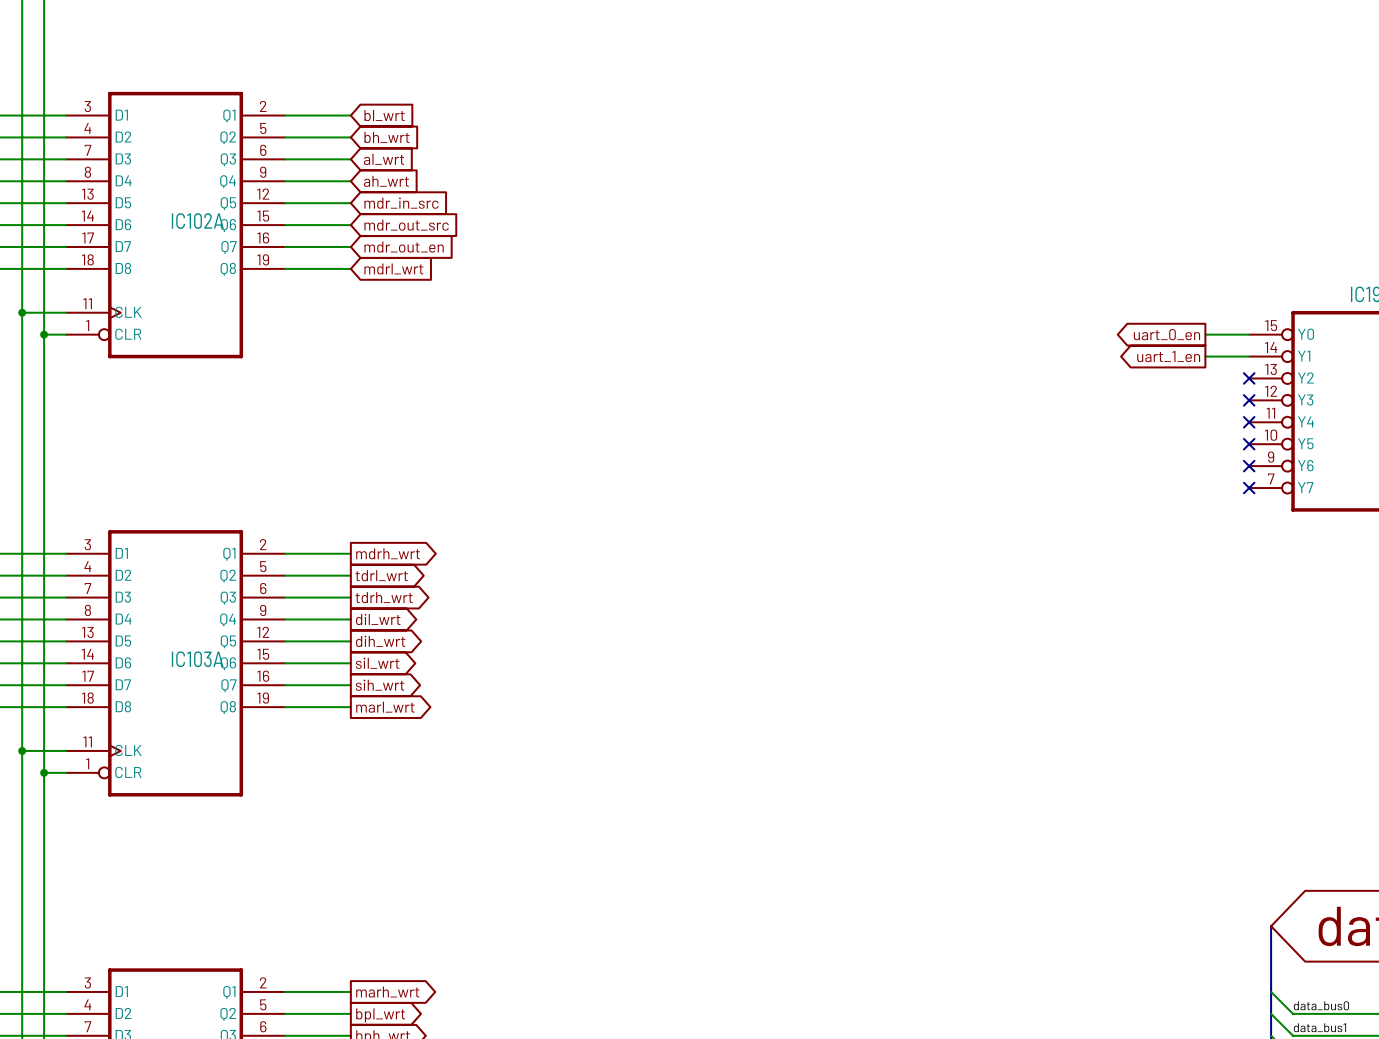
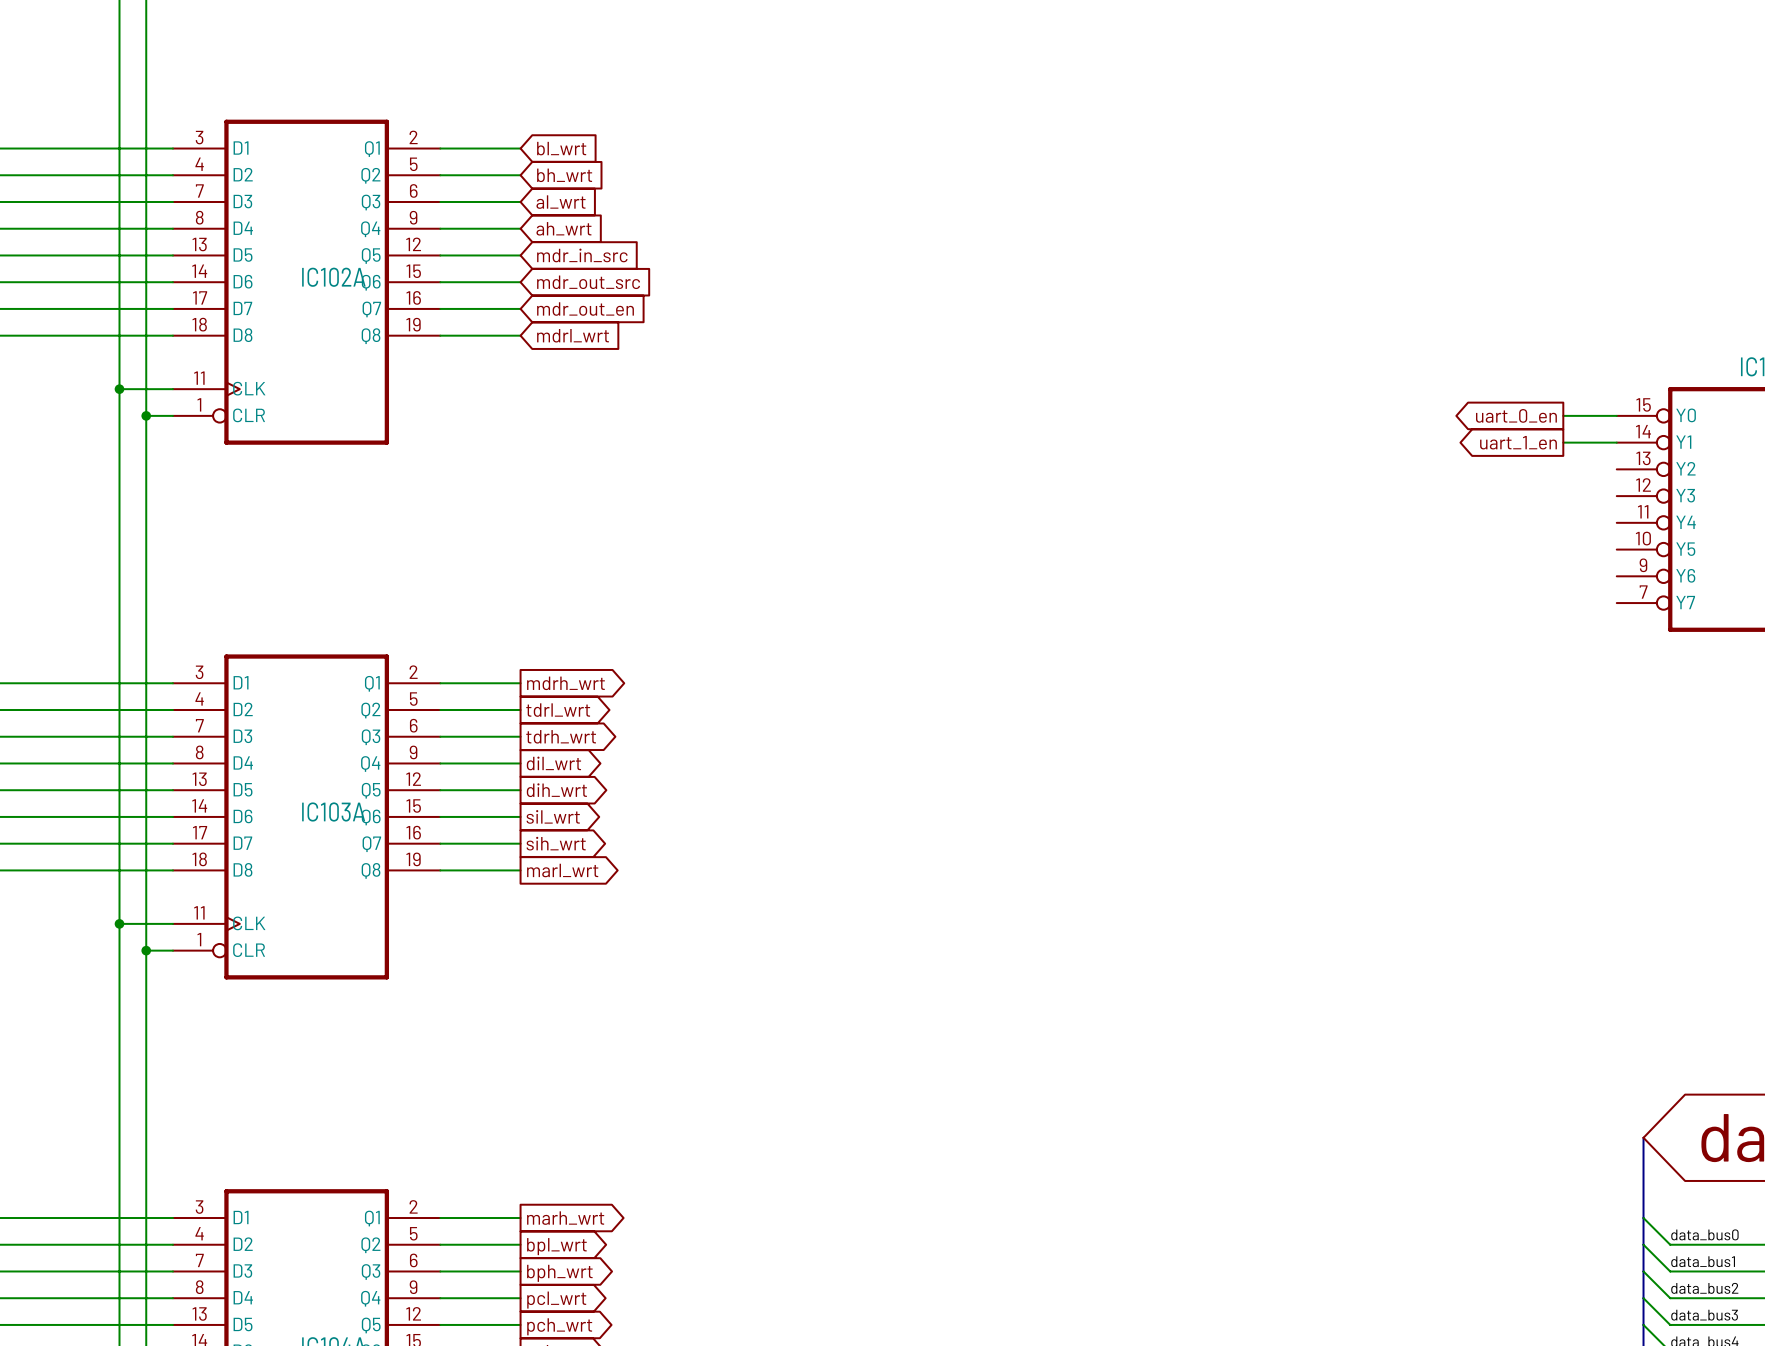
no-connect mark: (1249, 378) -> none
no-connect mark: (1249, 400) -> none
no-connect mark: (1249, 422) -> none
no-connect mark: (1249, 444) -> none
no-connect mark: (1249, 466) -> none
no-connect mark: (1249, 488) -> none

